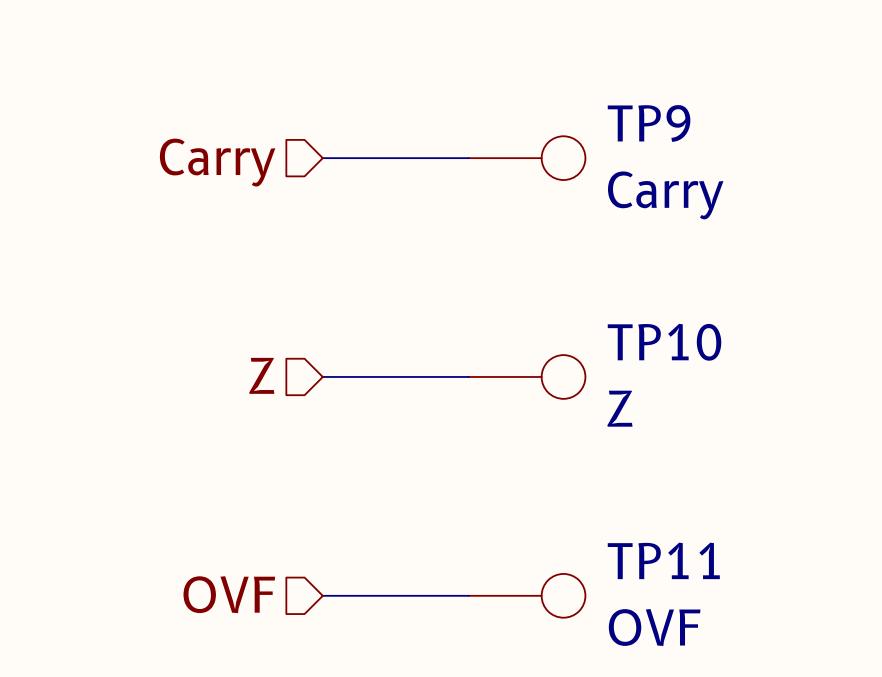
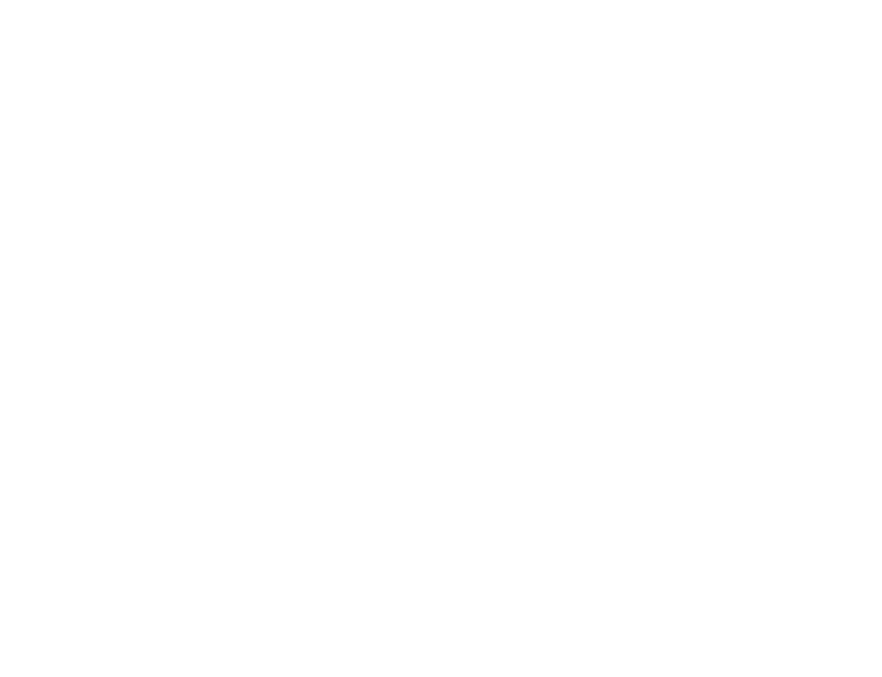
wire: (322, 158) (468, 158) -> none
TP9: Carry (527, 158) -> none
hierarchical label: Carry (217, 162) -> none
hierarchical label: Z (261, 375) -> none
wire: (322, 376) (468, 376) -> none
TP10: Z (527, 376) -> none
hierarchical label: OVF (229, 594) -> none
wire: (322, 595) (468, 595) -> none
TP11: OVF (527, 595) -> none

